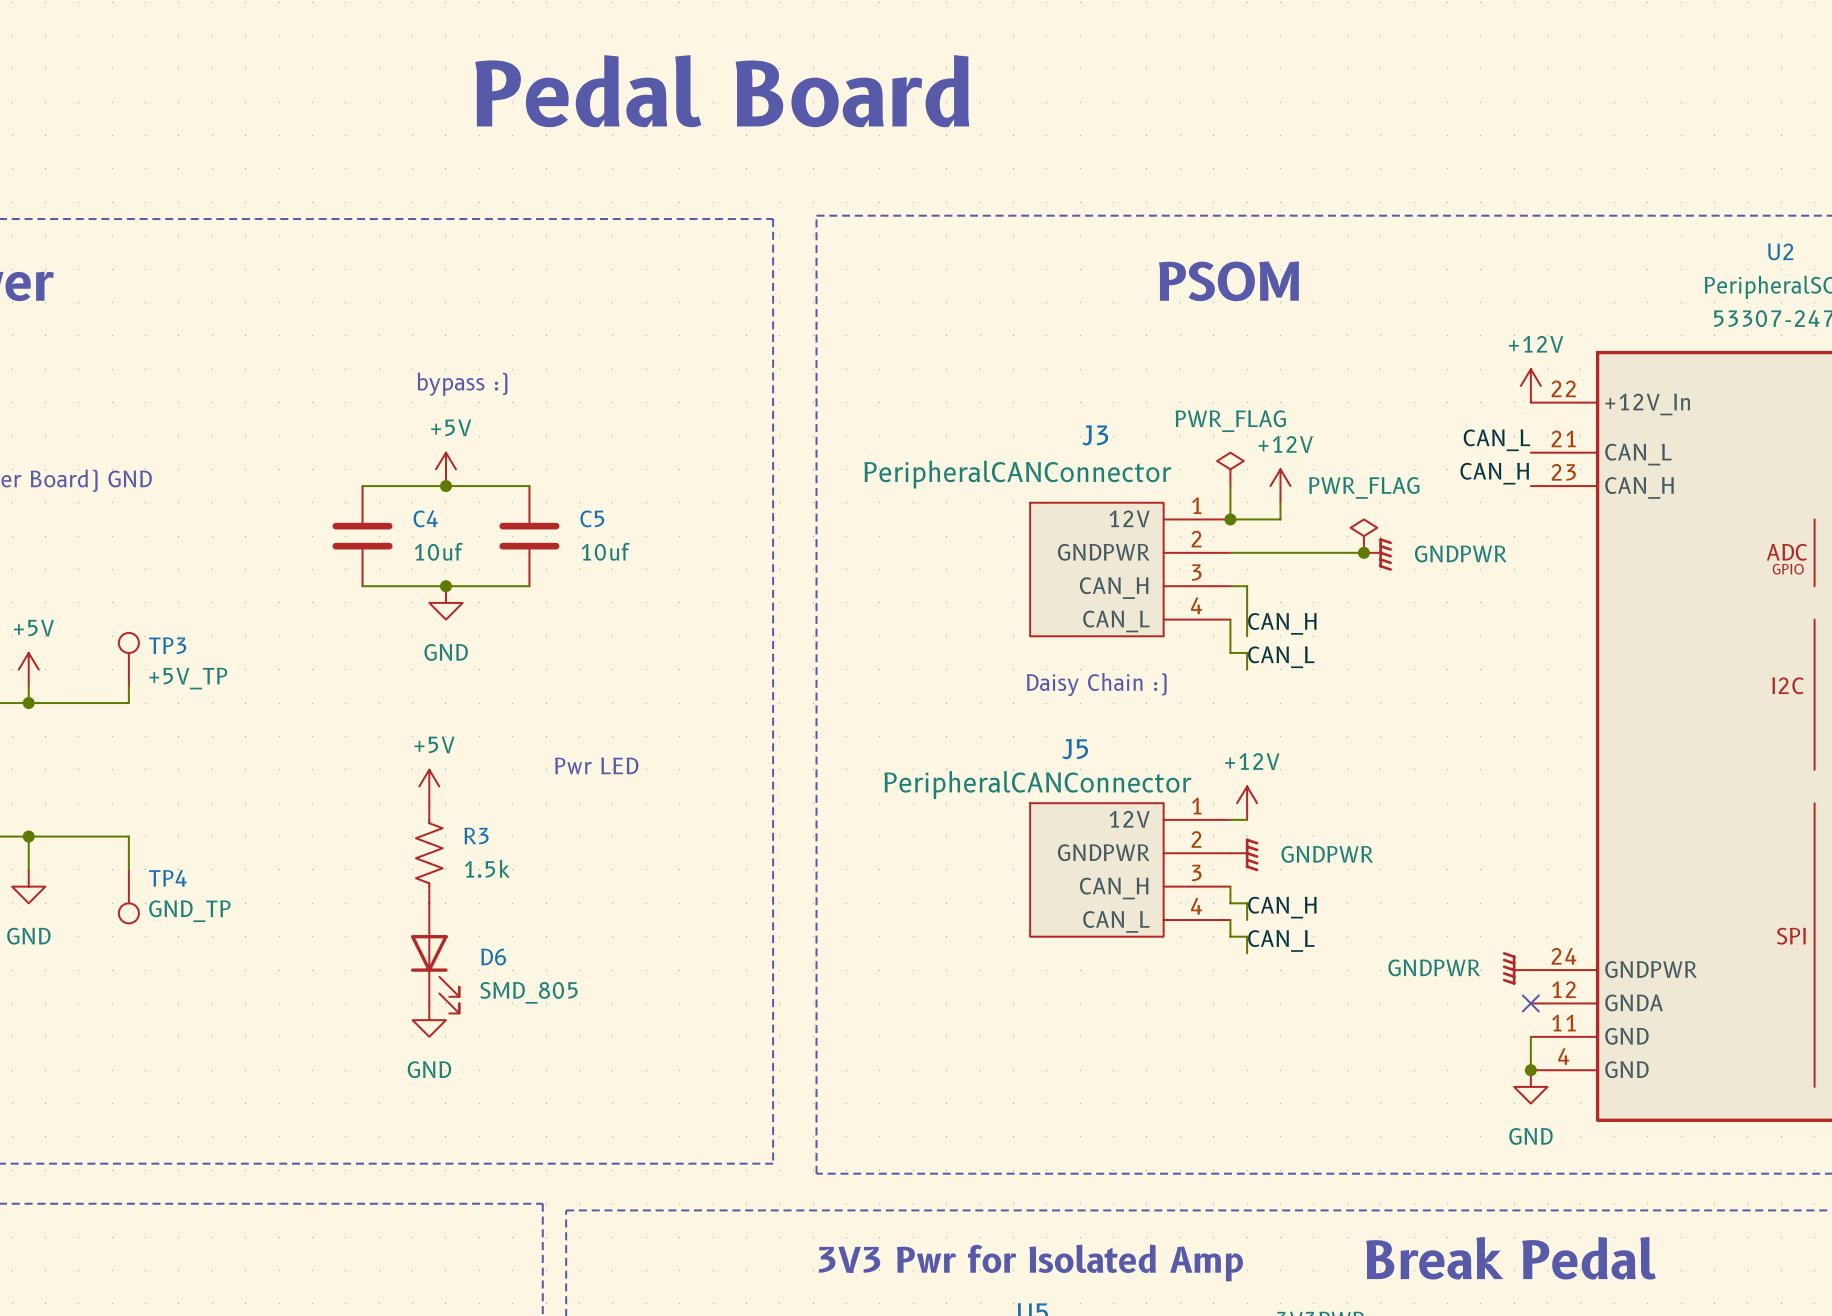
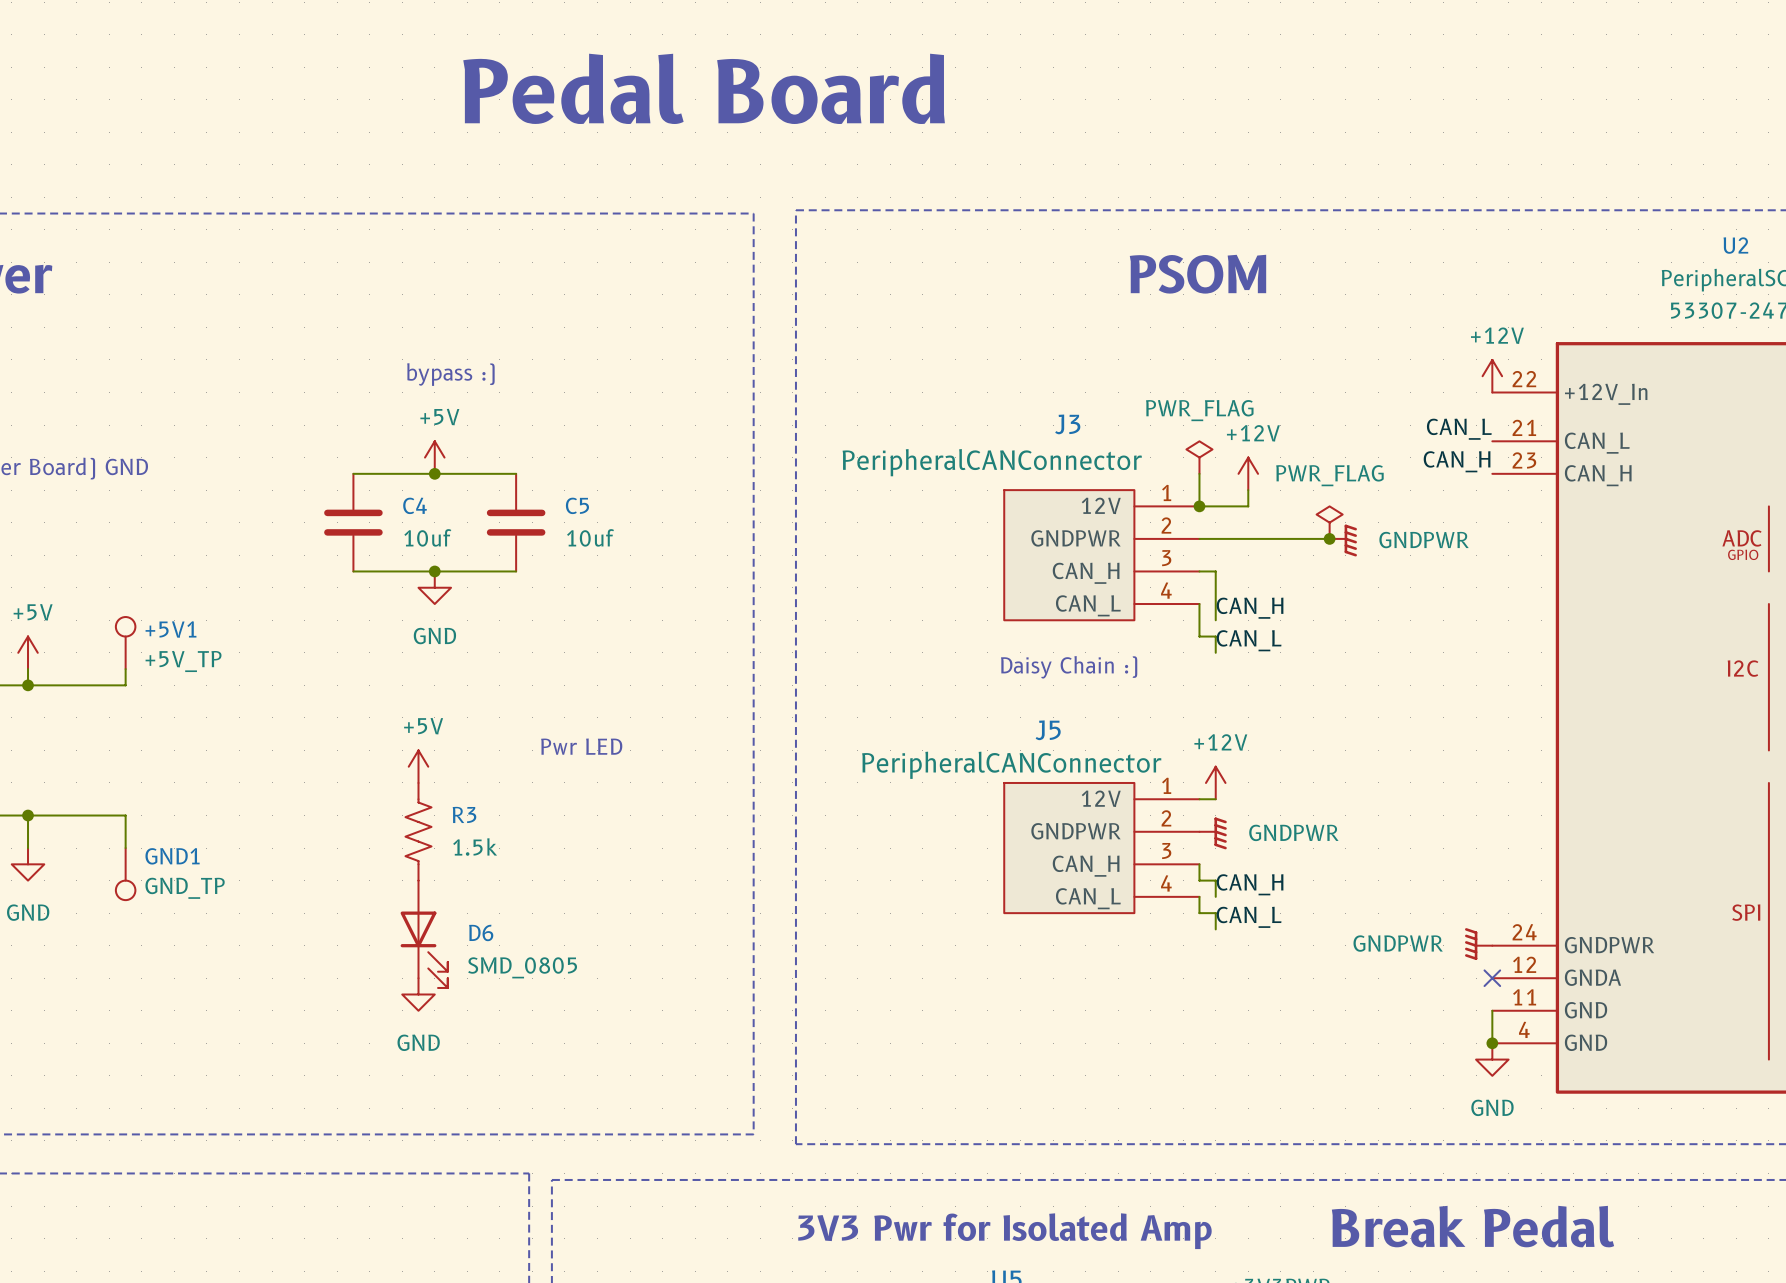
TP3 name: TP3 (167, 645) -> +5V1 (171, 629)
TP4 name: TP4 (167, 878) -> GND1 (172, 856)
D6 value: SMD_805 (528, 992) -> SMD_0805 (522, 967)

